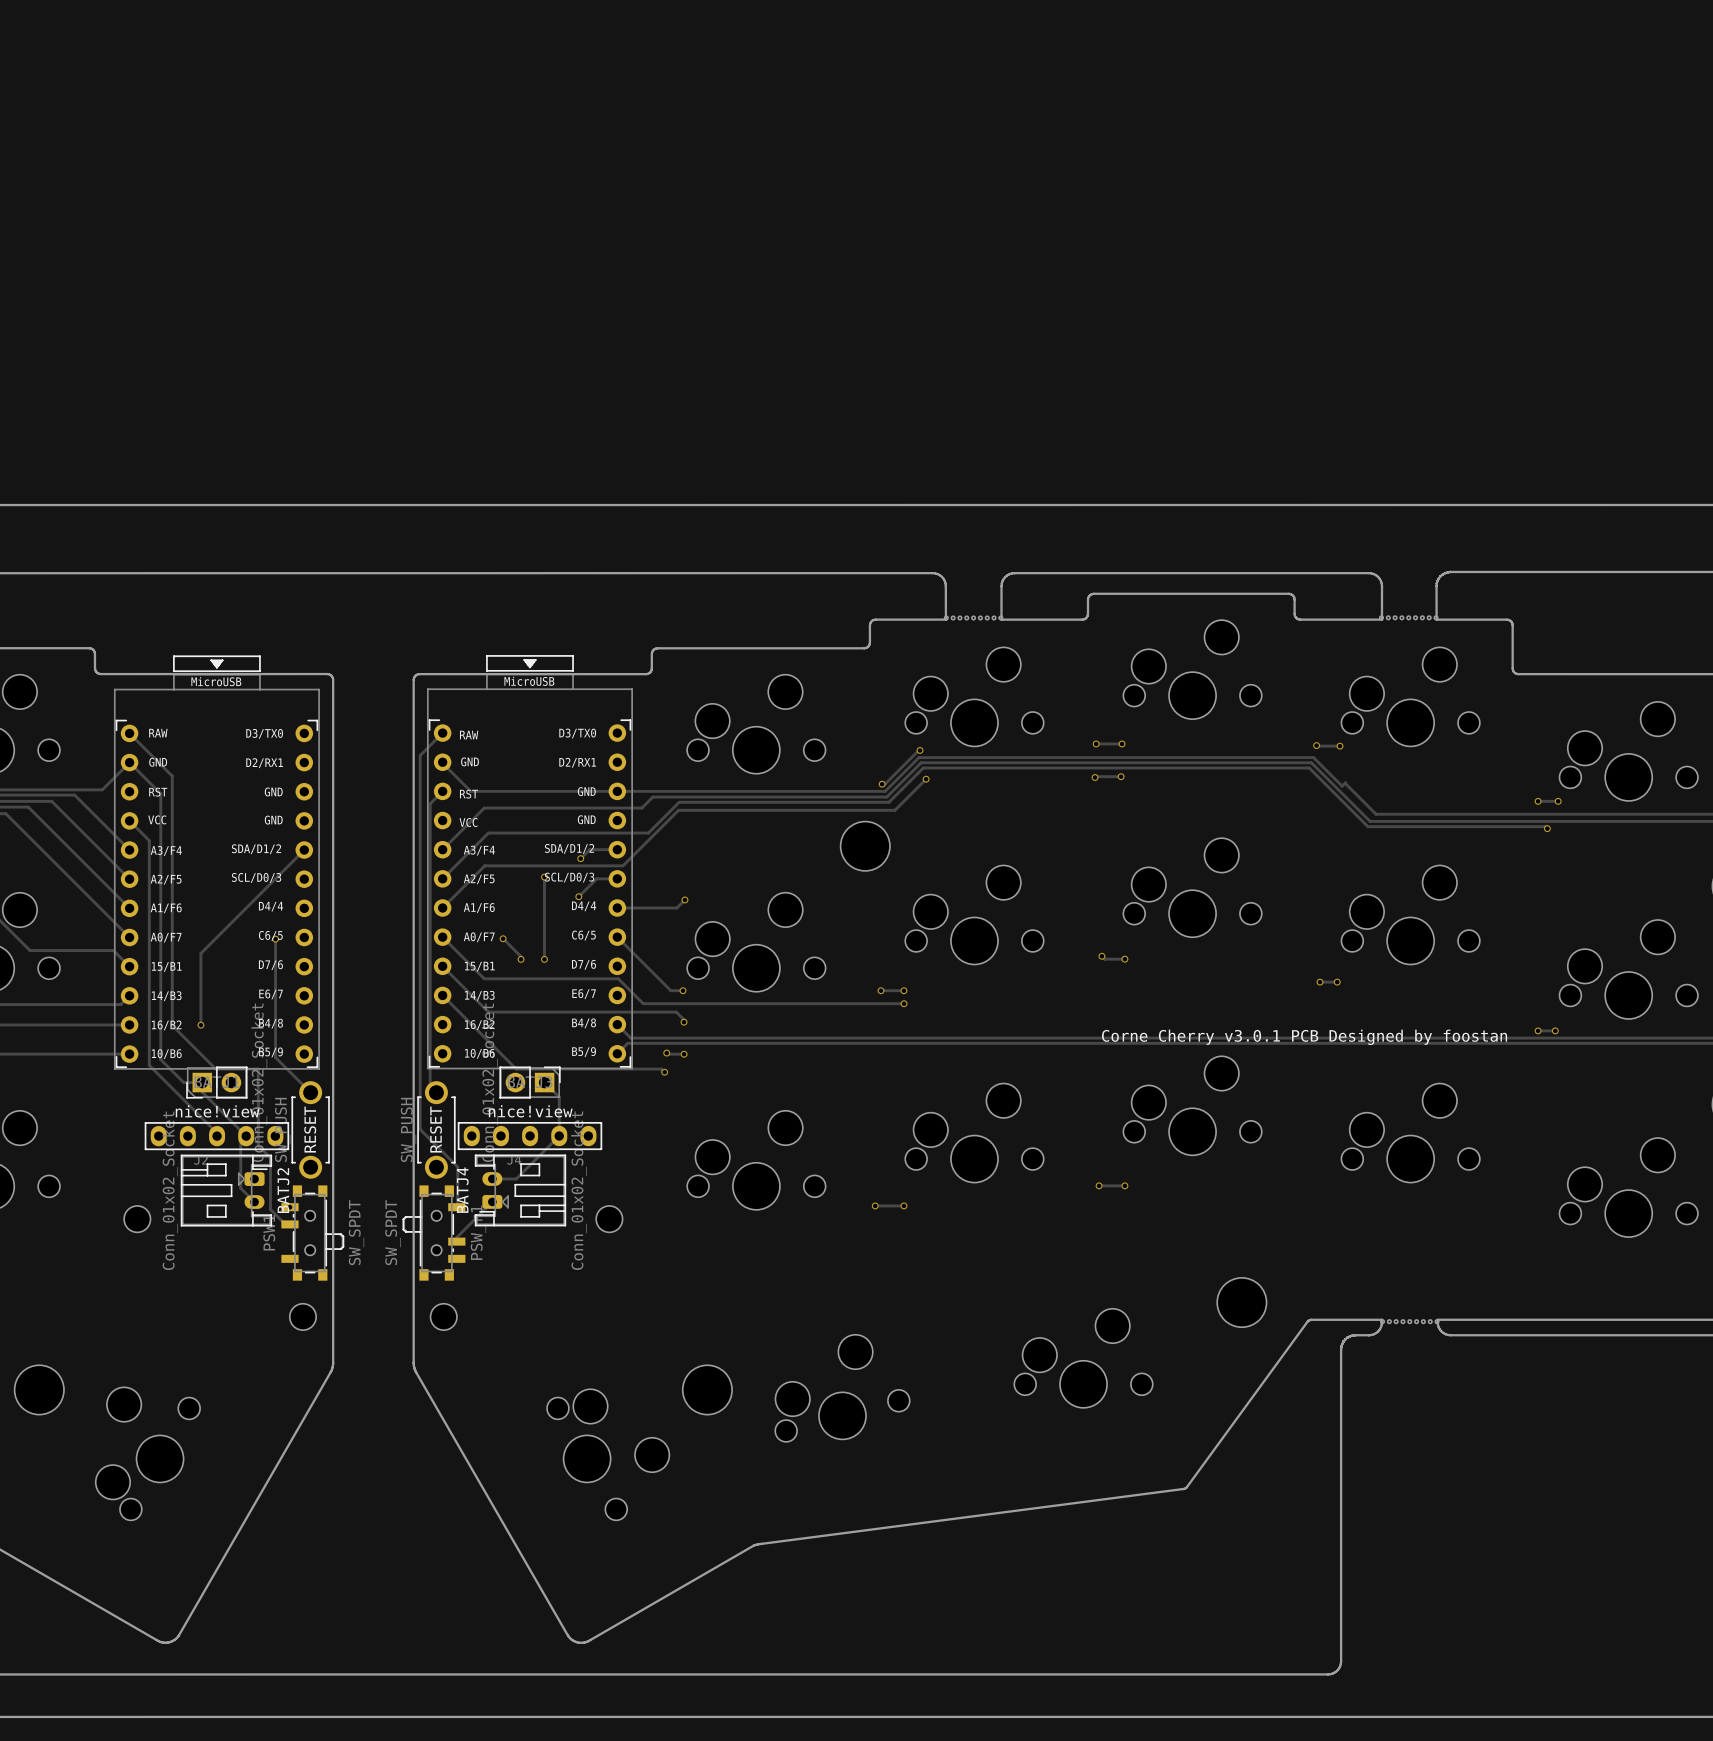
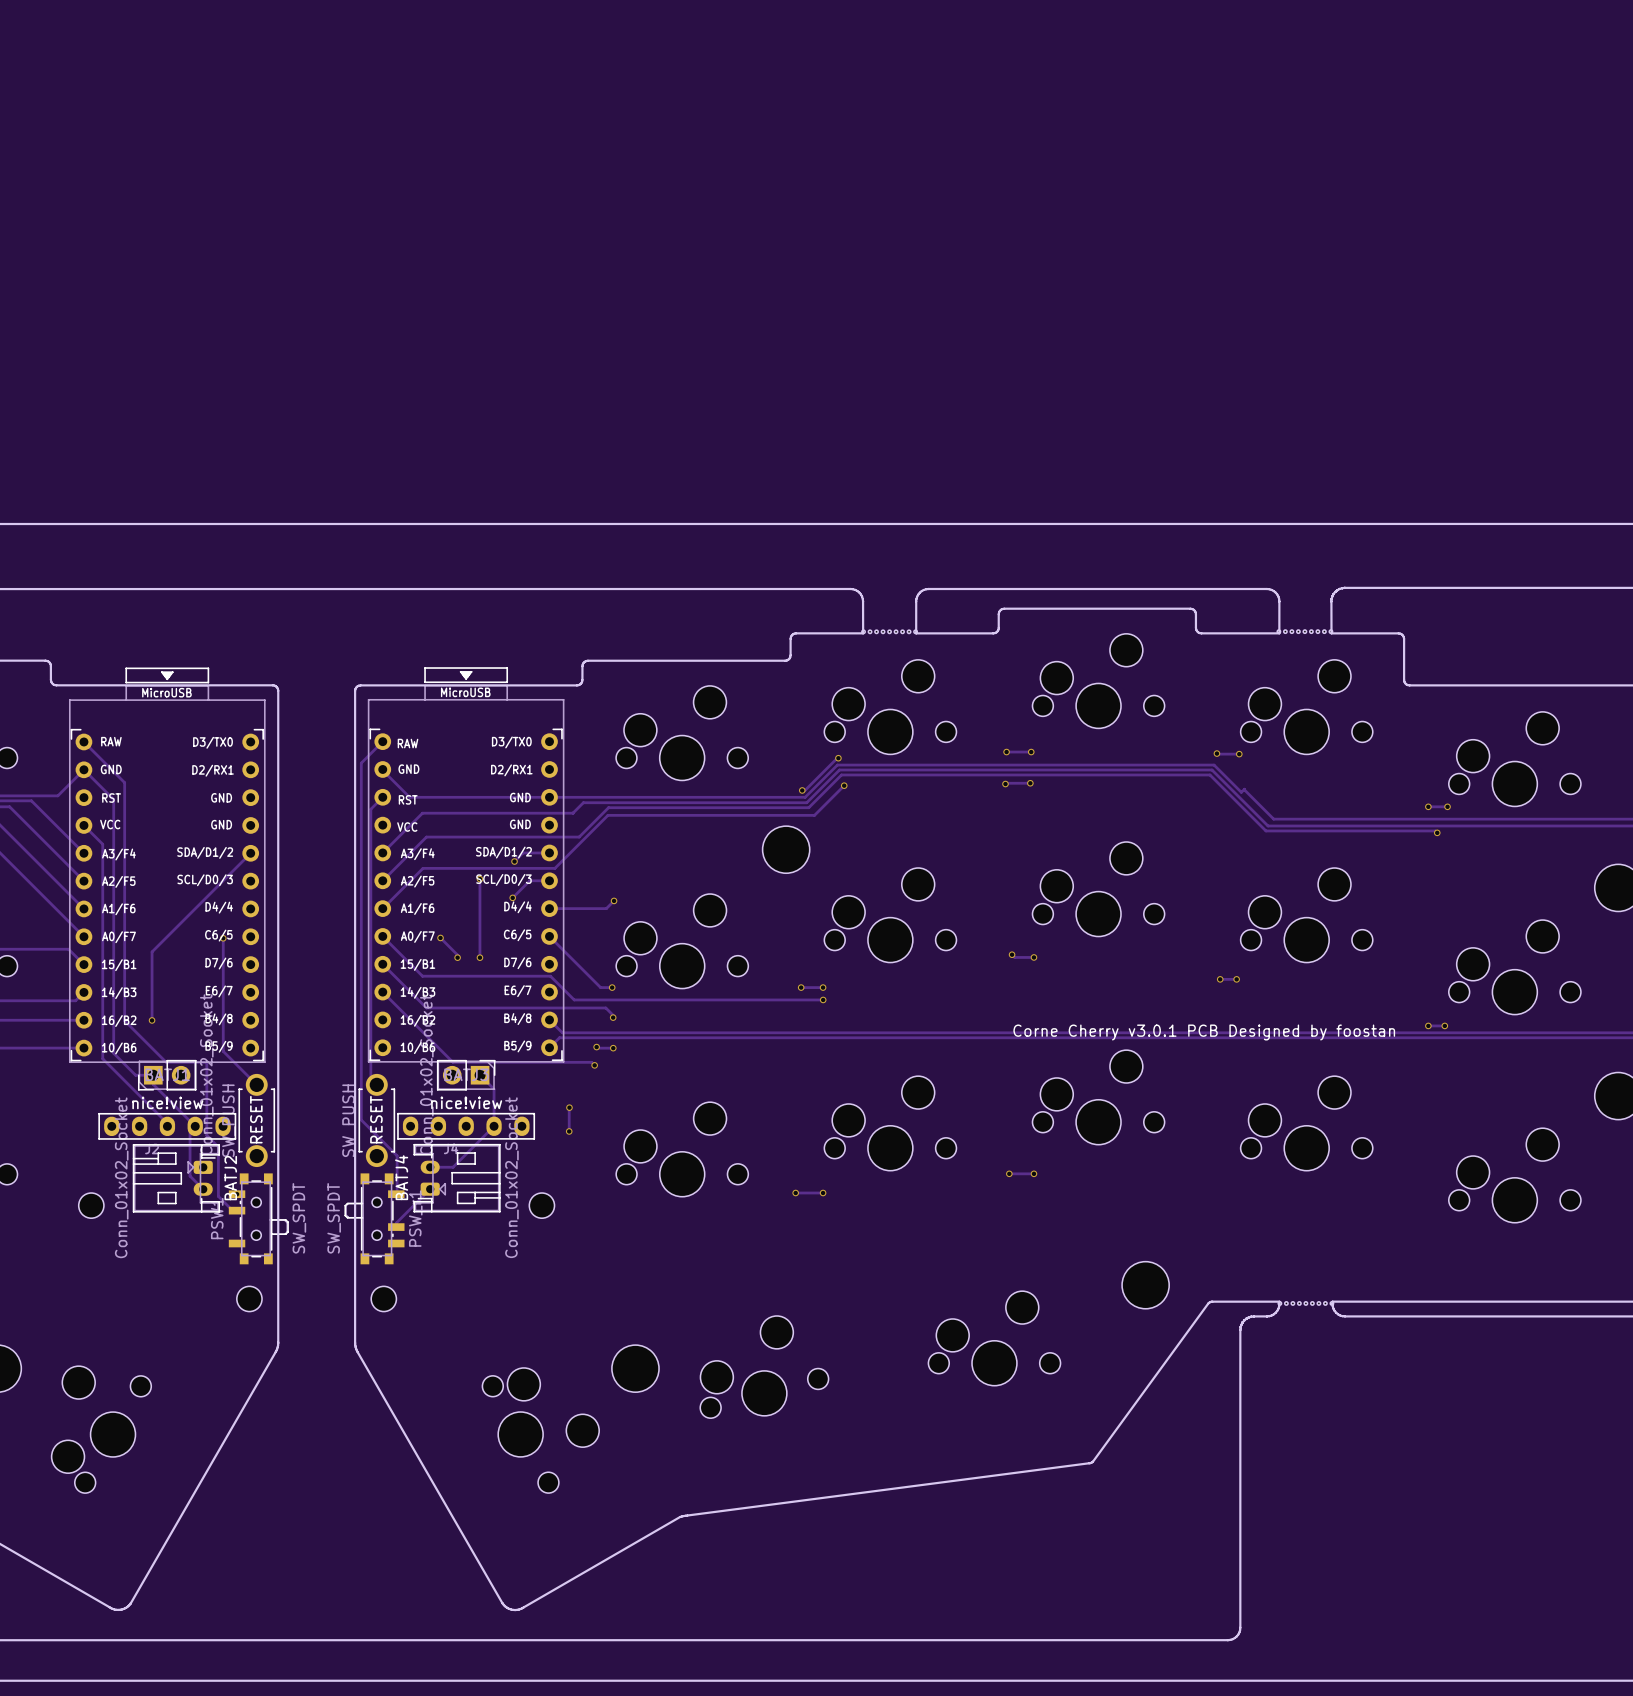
track: none -> (569, 1107) (569, 1131)
via: none -> (569, 1107)
via: none -> (569, 1131)

